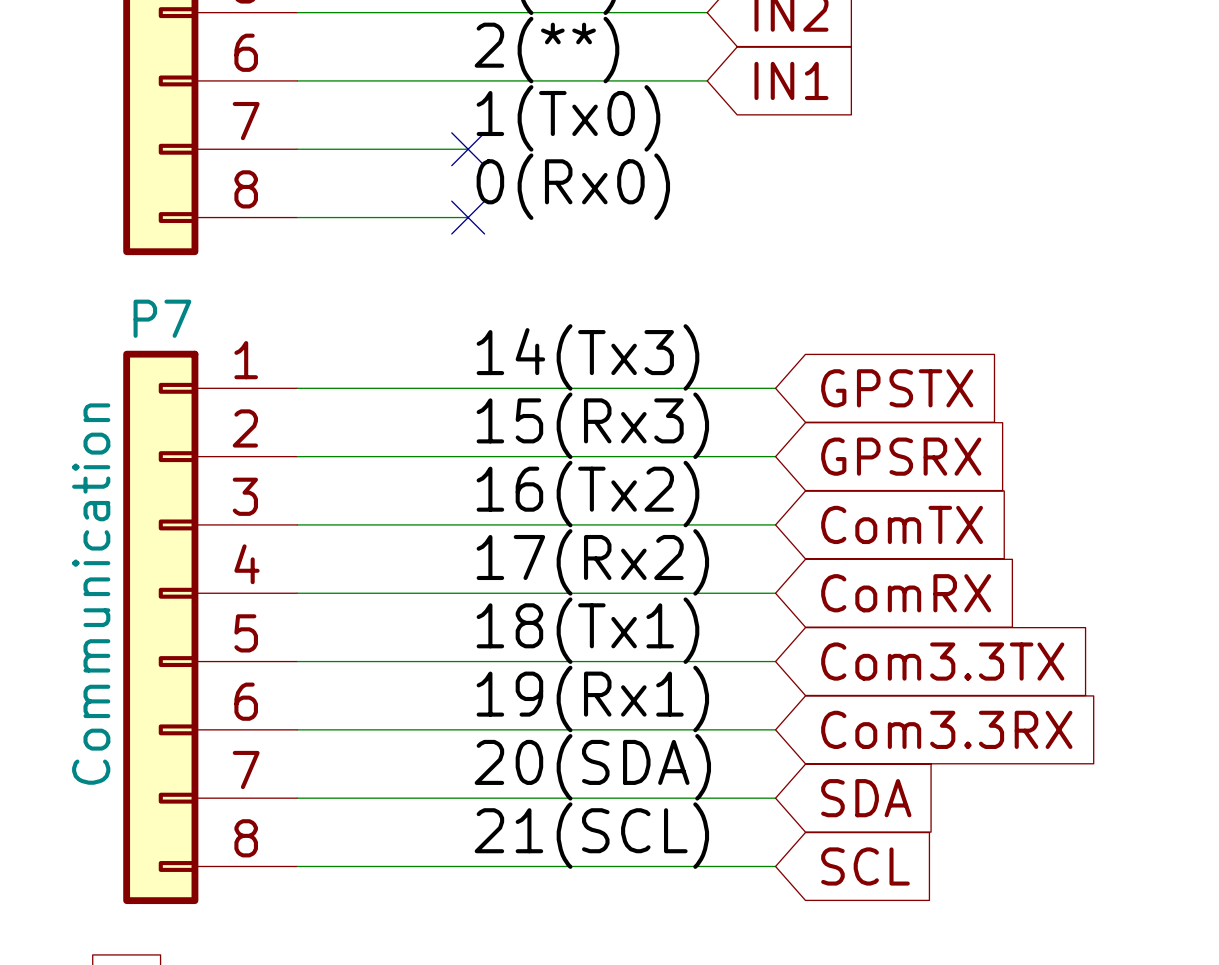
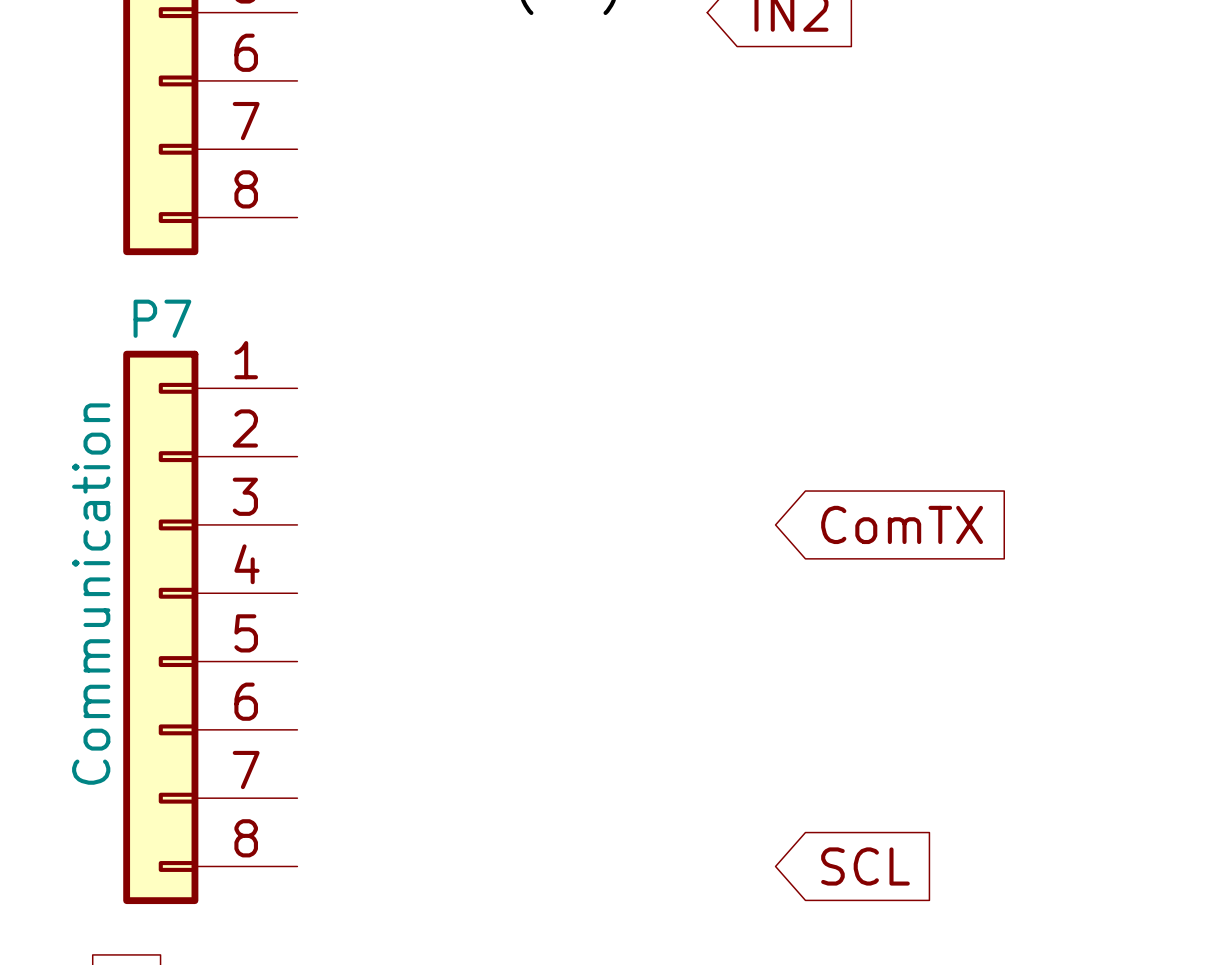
wire: (297, 12) (707, 12) -> none
label: 2(**) (546, 50) -> none
wire: (297, 80) (707, 80) -> none
global label: IN1 (791, 80) -> none
label: 1(Tx0) (568, 118) -> none
wire: (297, 149) (468, 149) -> none
no-connect mark: (468, 149) -> none
label: 0(Rx0) (573, 186) -> none
wire: (297, 217) (468, 217) -> none
no-connect mark: (468, 217) -> none
label: 14(Tx3) (587, 357) -> none
wire: (297, 388) (775, 388) -> none
global label: GPSTX (897, 388) -> none
label: 15(Rx3) (592, 425) -> none
wire: (297, 456) (775, 456) -> none
global label: GPSRX (901, 456) -> none
label: 16(Tx2) (587, 494) -> none
wire: (297, 524) (775, 524) -> none
label: 17(Rx2) (592, 562) -> none
wire: (297, 593) (775, 593) -> none
global label: ComRX (906, 593) -> none
label: 18(Tx1) (587, 630) -> none
wire: (297, 661) (775, 661) -> none
global label: Com3.3TX (942, 661) -> none
label: 19(Rx1) (592, 698) -> none
wire: (297, 729) (775, 729) -> none
global label: Com3.3RX (946, 729) -> none
label: 20(SDA) (592, 767) -> none
wire: (297, 798) (775, 798) -> none
global label: SDA (866, 798) -> none
label: 21(SCL) (591, 835) -> none
wire: (297, 866) (775, 866) -> none

